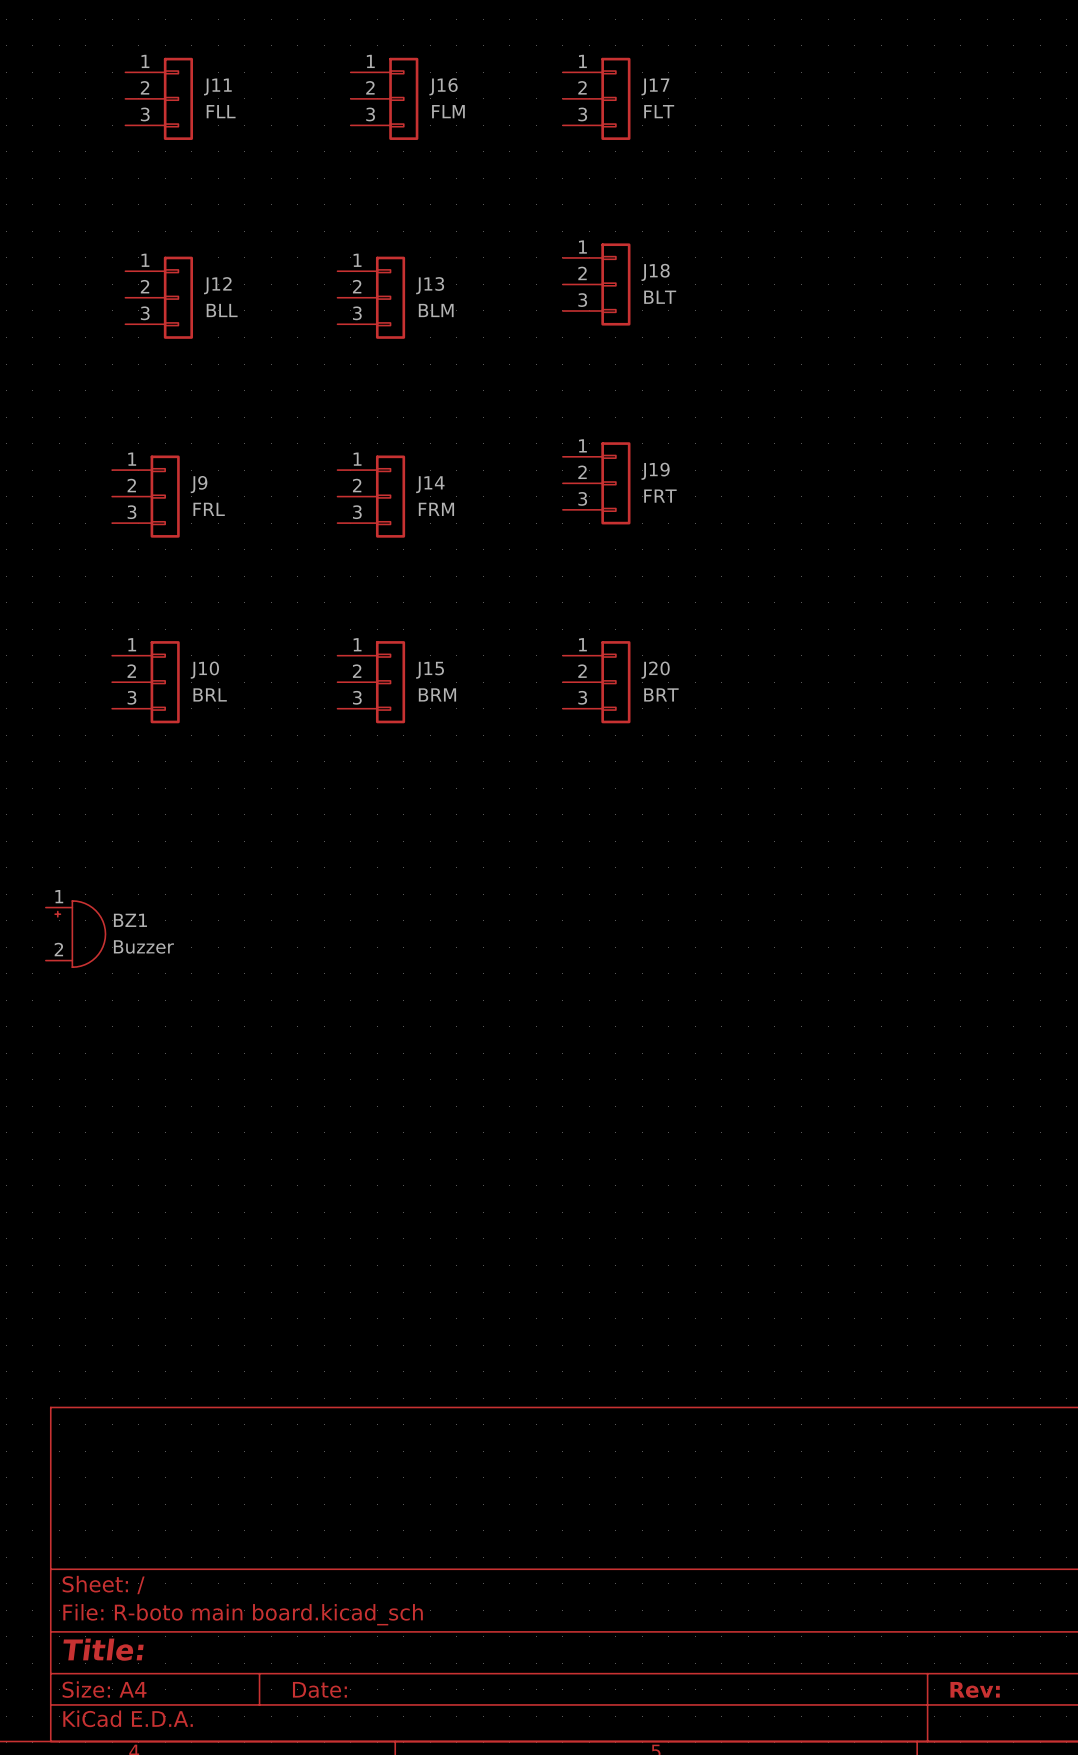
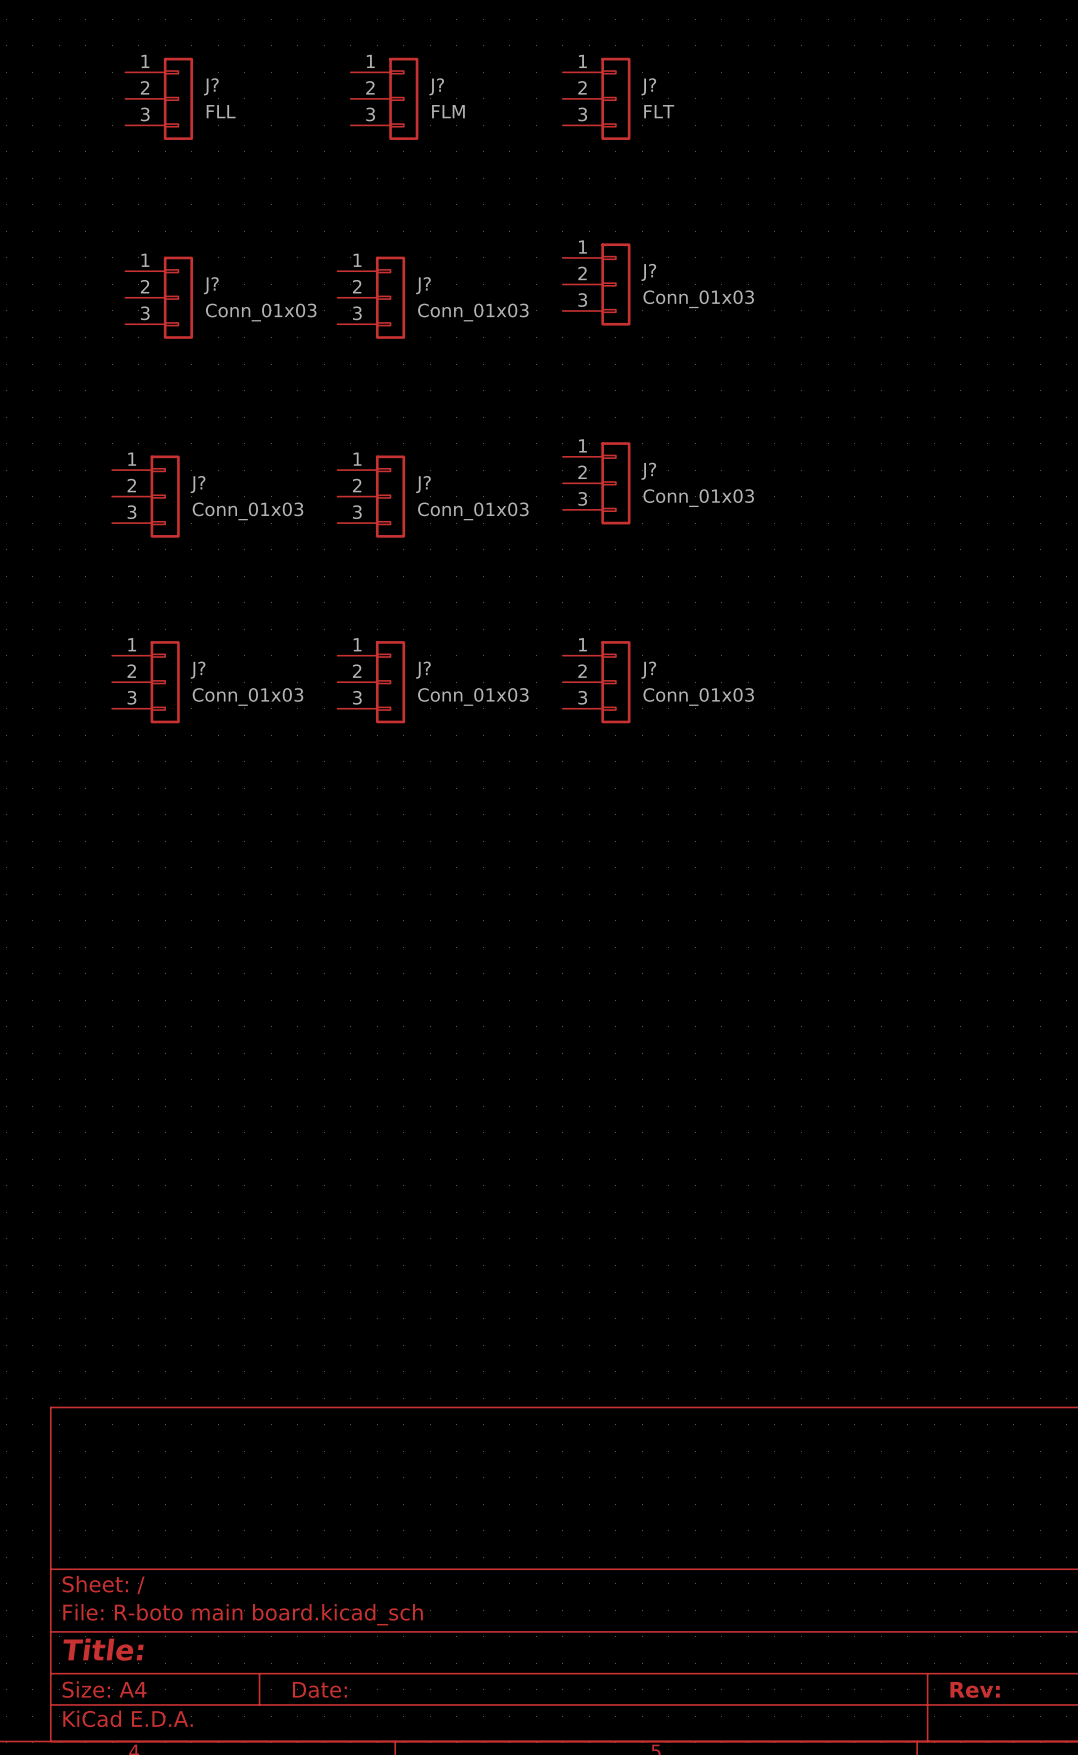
J11 name: J11 (217, 86) -> J? (211, 86)
J16 name: J16 (443, 86) -> J? (436, 86)
J17 name: J17 (655, 86) -> J? (648, 86)
J18 name: J18 (655, 272) -> J? (648, 272)
J12 name: J12 (217, 285) -> J? (211, 285)
J13 name: J13 (430, 285) -> J? (423, 285)
J18 value: BLT (660, 297) -> Conn_01x03 (698, 299)
J12 value: BLL (222, 310) -> Conn_01x03 (261, 312)
J13 value: BLM (436, 310) -> Conn_01x03 (473, 312)
J19 name: J19 (655, 471) -> J? (648, 471)
J9 name: J9 (199, 484) -> J? (198, 484)
J14 name: J14 (430, 484) -> J? (423, 484)
J19 value: FRT (660, 496) -> Conn_01x03 (698, 498)
J9 value: FRL (209, 509) -> Conn_01x03 (247, 511)
J14 value: FRM (436, 509) -> Conn_01x03 (473, 511)
J10 name: J10 (204, 670) -> J? (198, 670)
J15 name: J15 (430, 670) -> J? (423, 670)
J20 name: J20 (655, 670) -> J? (648, 670)
J10 value: BRL (210, 694) -> Conn_01x03 (247, 696)
J15 value: BRM (437, 694) -> Conn_01x03 (473, 696)
J20 value: BRT (661, 694) -> Conn_01x03 (698, 696)
BZ1: Buzzer (75, 934) -> none

